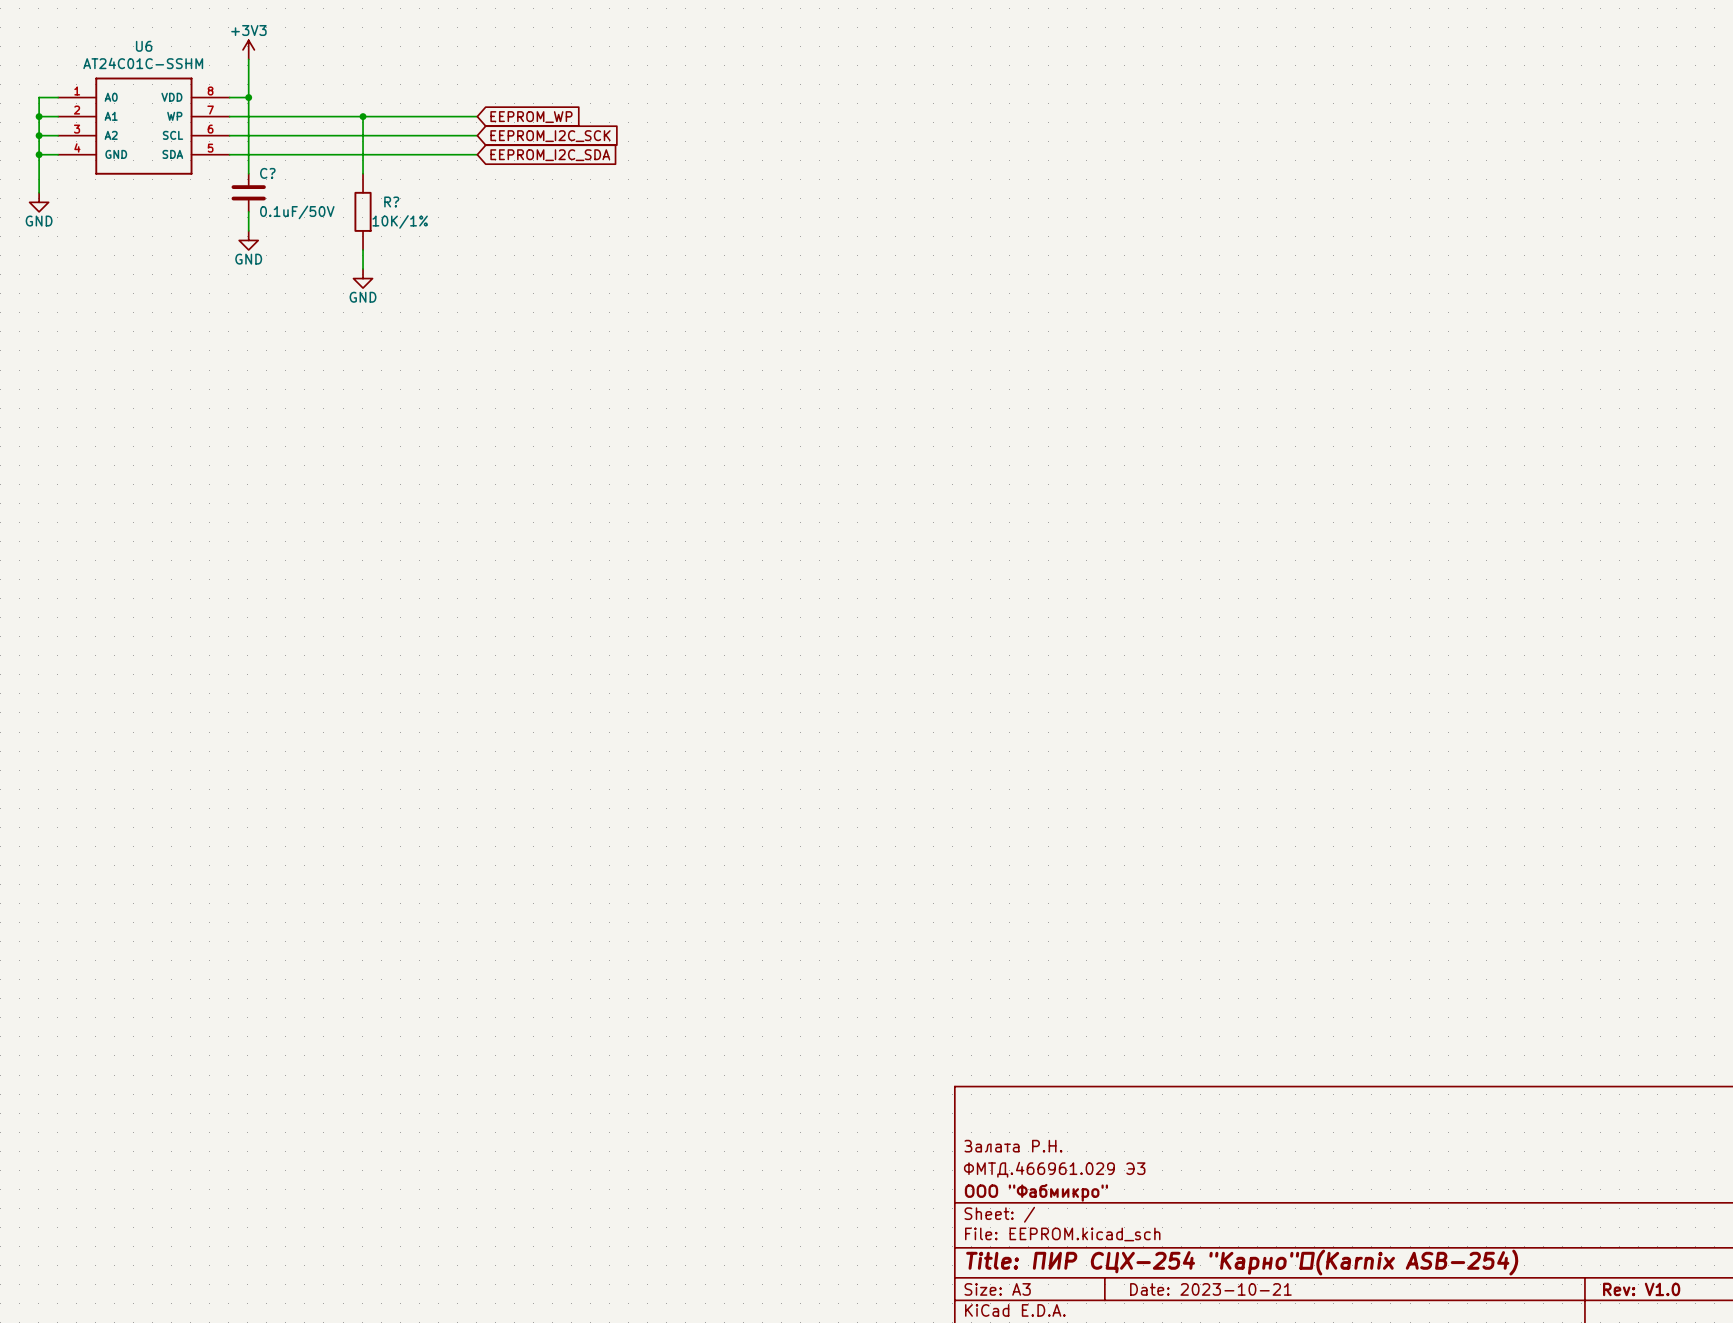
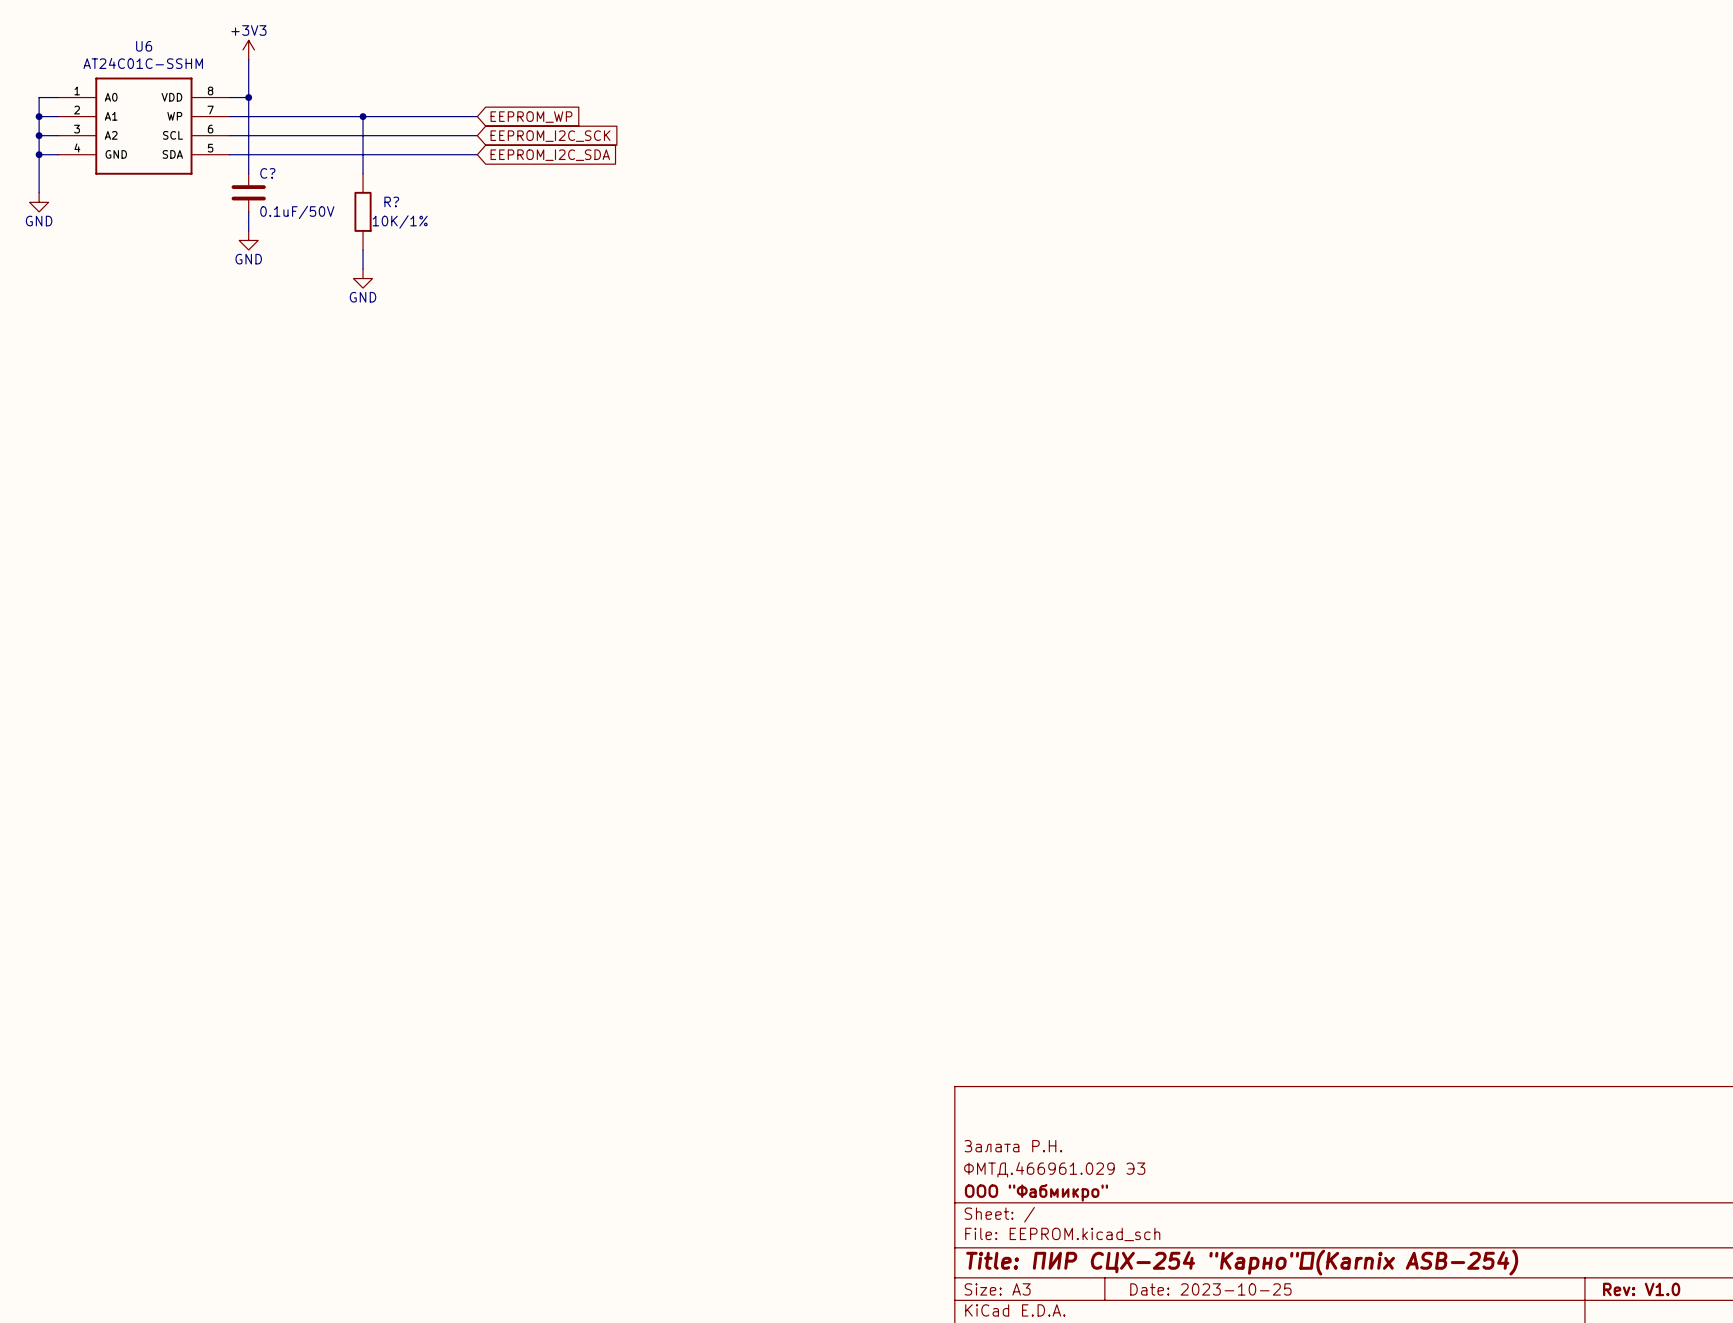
title block: Date: 2023-10-21 (1210, 1289) -> Date: 2023-10-25 (1210, 1289)

